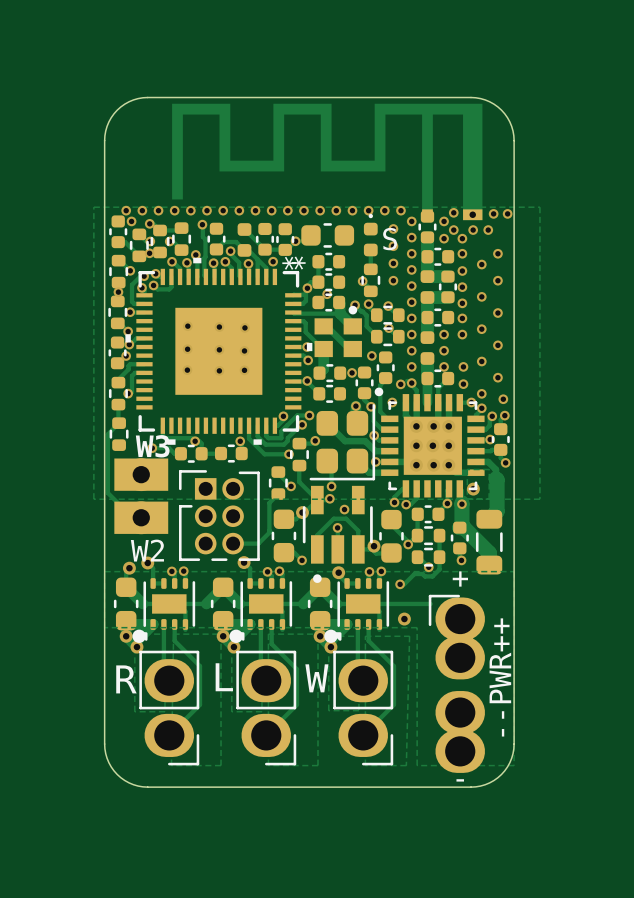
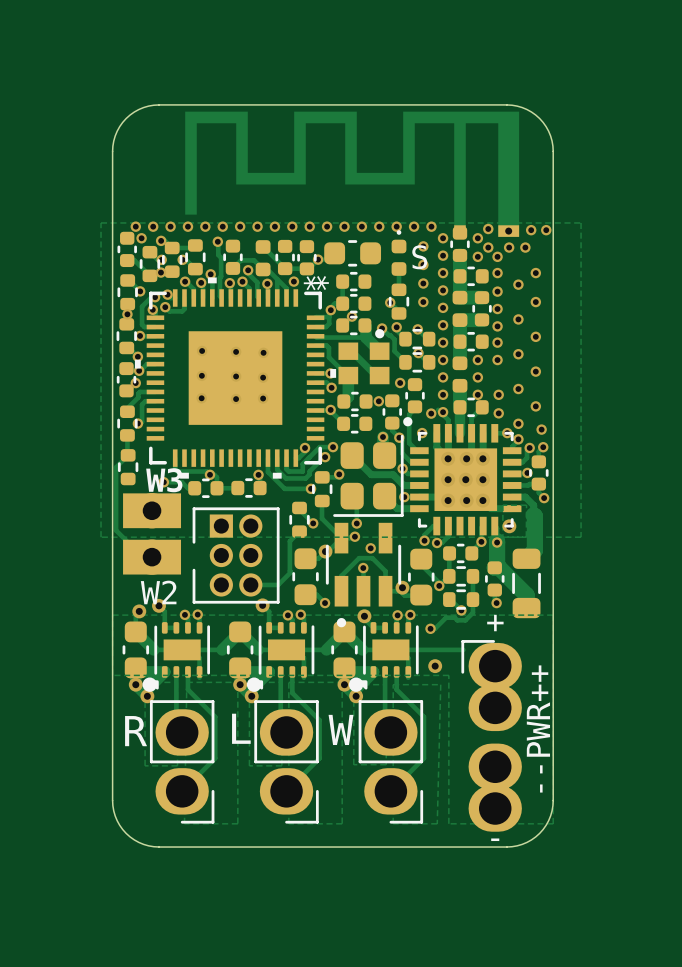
part footprint: [178, 470, 260, 561] -> [192, 507, 280, 604]

